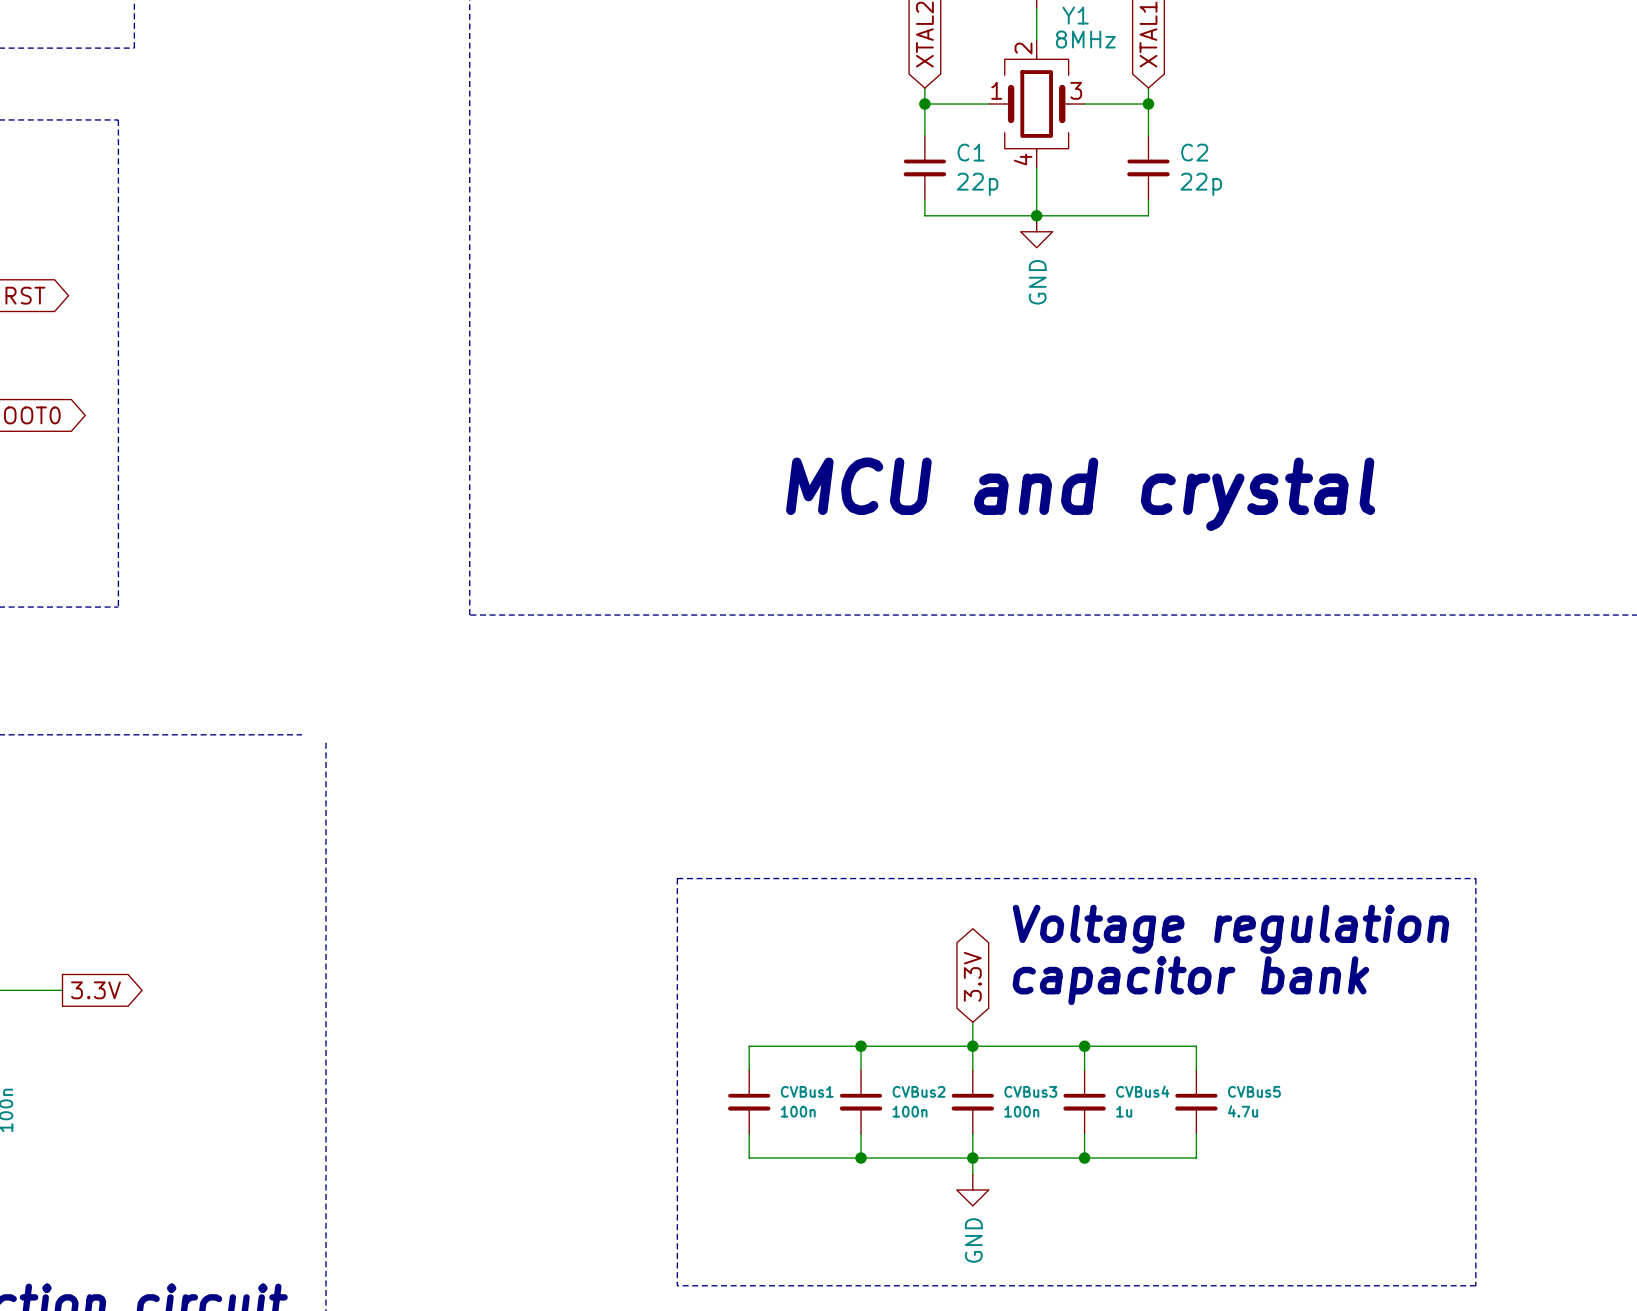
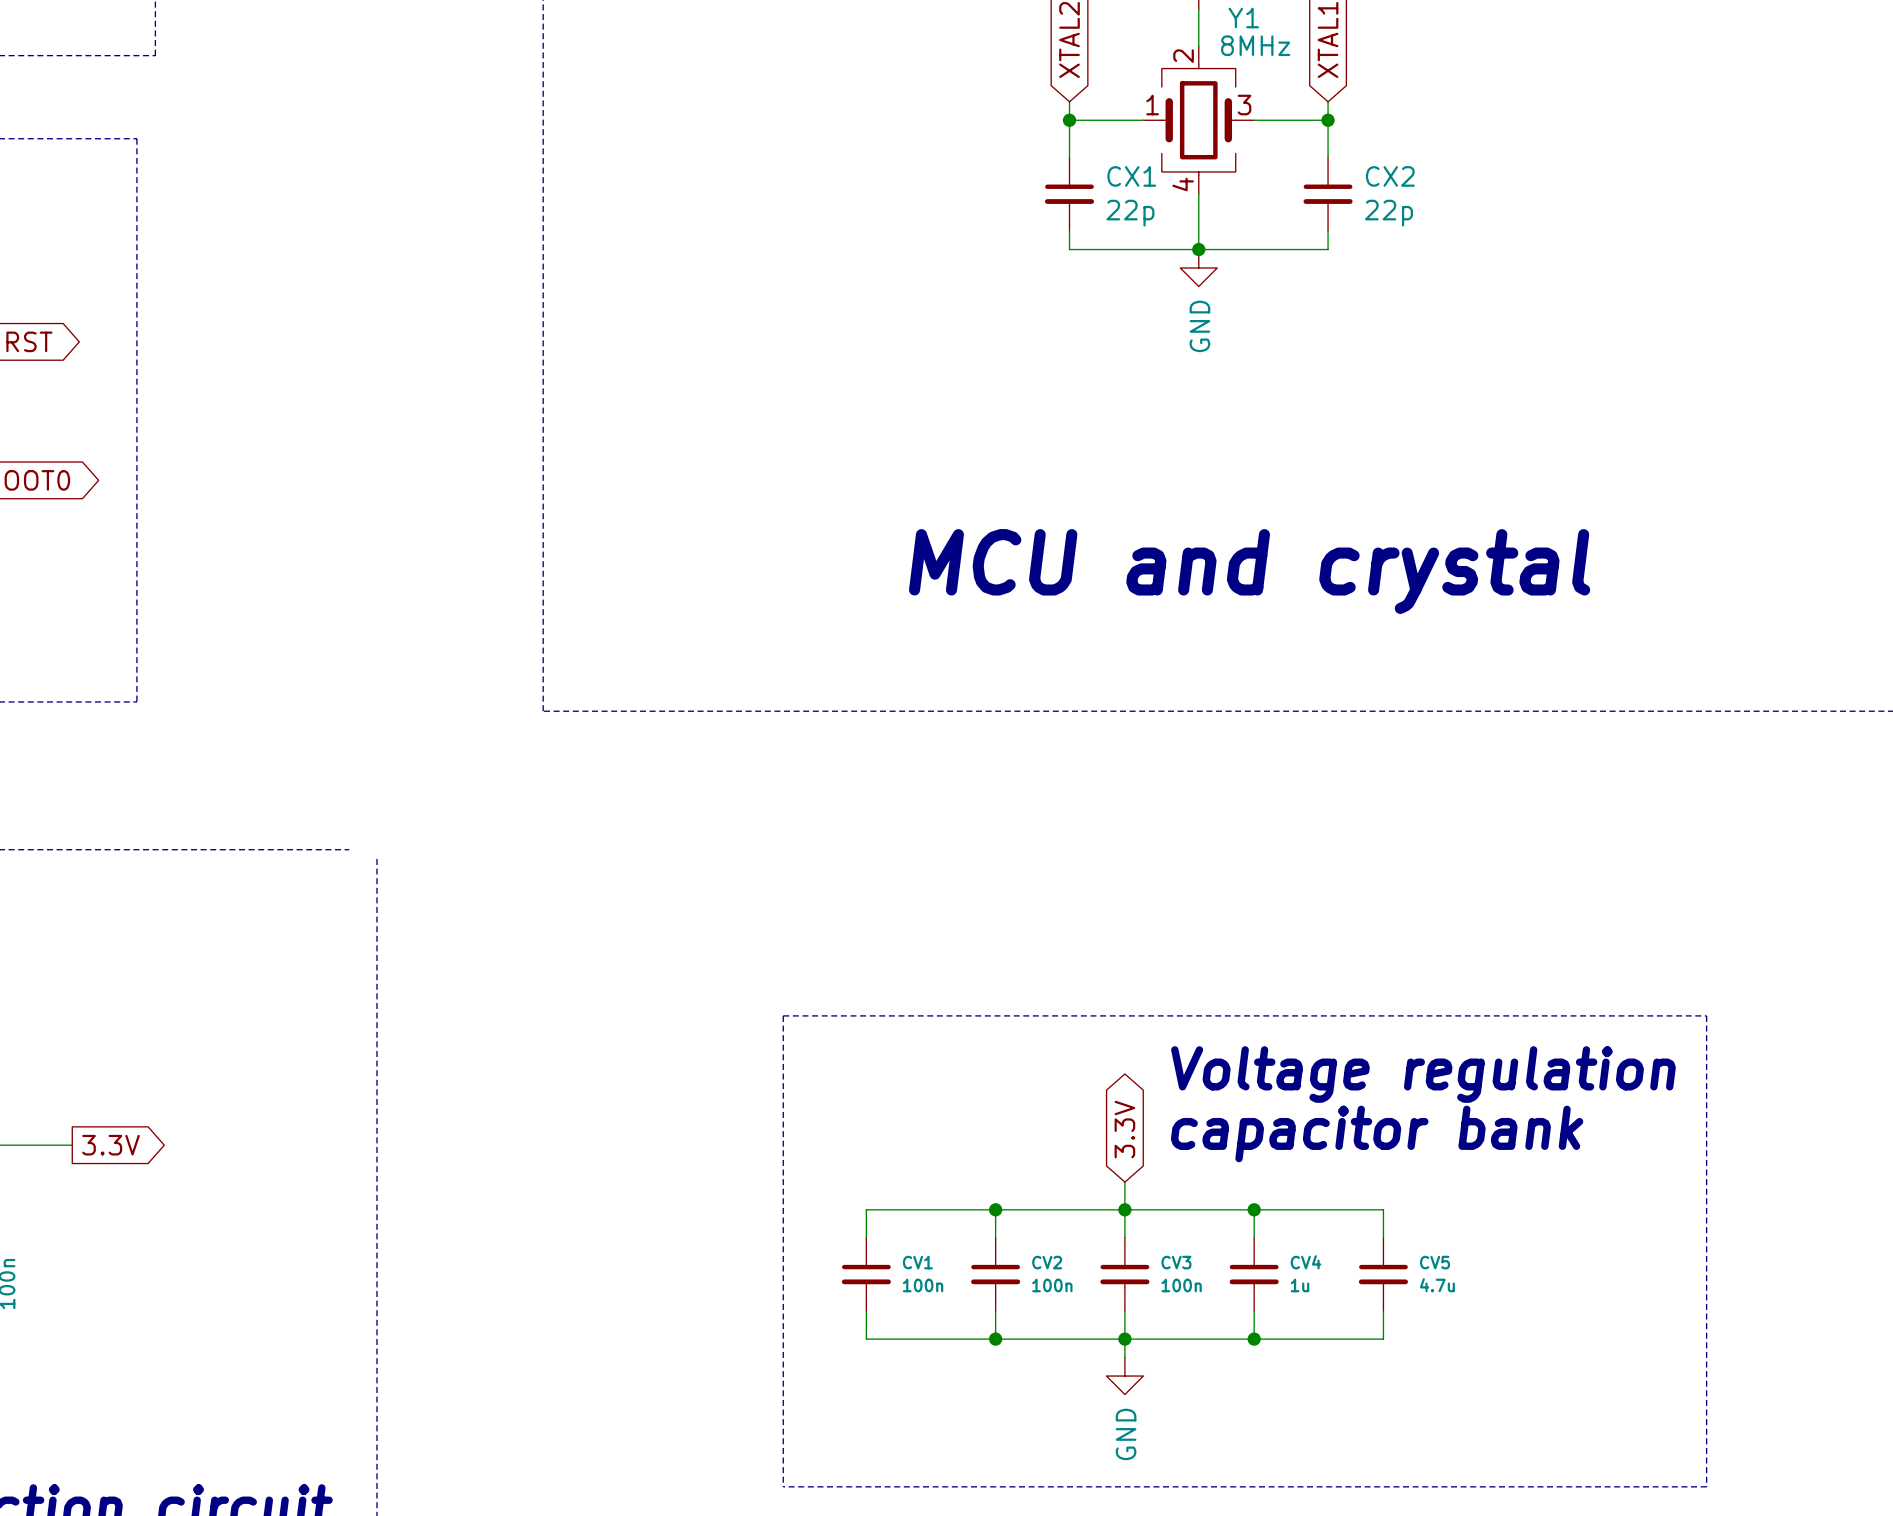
C1 name: C1 (971, 152) -> CX1 (1131, 176)
C2 name: C2 (1194, 152) -> CX2 (1390, 176)
CVBus1 name: CVBus1 (807, 1091) -> CV1 (917, 1262)
CVBus2 name: CVBus2 (919, 1091) -> CV2 (1047, 1262)
CVBus3 name: CVBus3 (1030, 1091) -> CV3 (1176, 1262)
CVBus4 name: CVBus4 (1142, 1091) -> CV4 (1305, 1262)
CVBus5 name: CVBus5 (1254, 1091) -> CV5 (1434, 1262)

